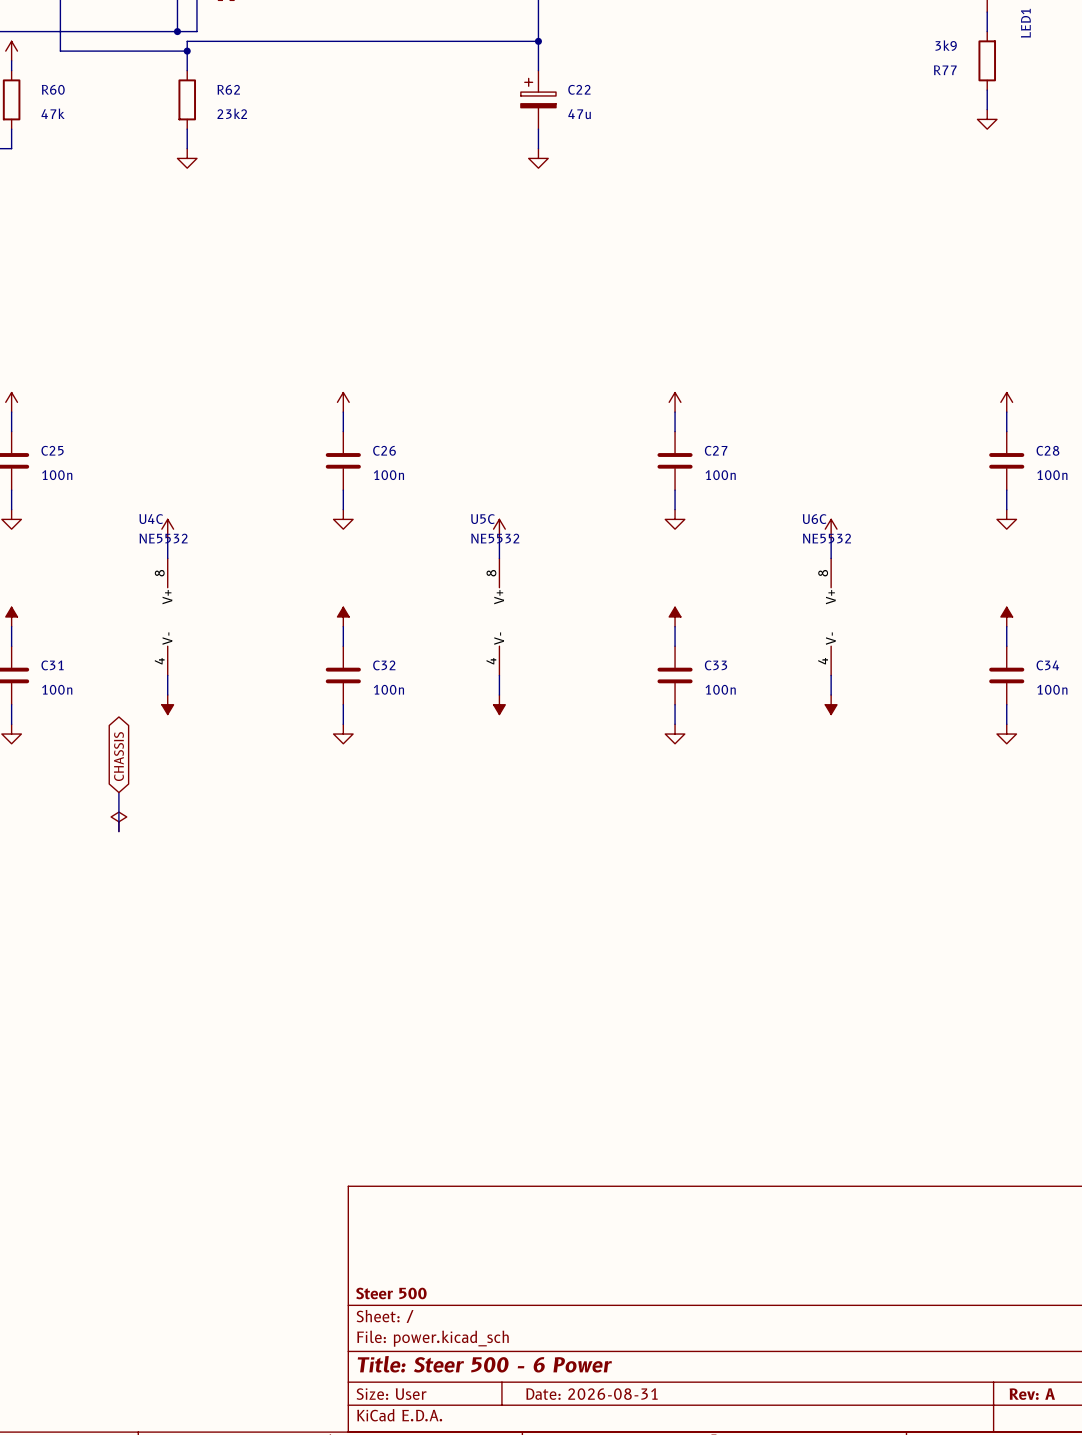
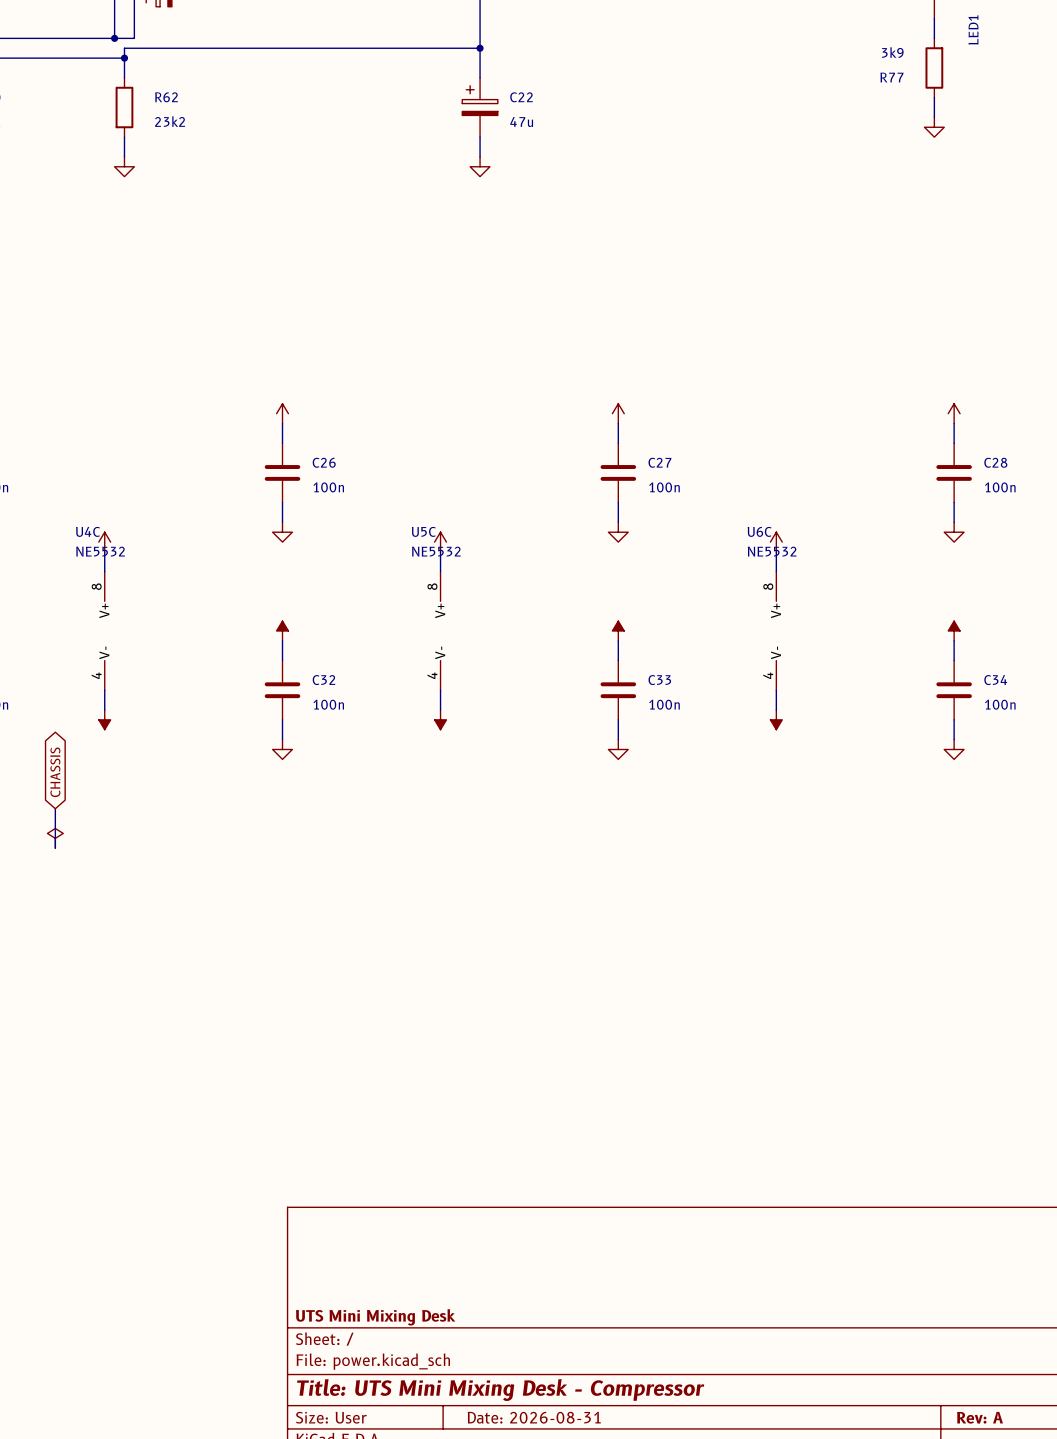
title block: Steer 500 (391, 1293) -> UTS Mini Mixing Desk (375, 1317)
title block: Title: Steer 500 - 6 Power (484, 1364) -> Title: UTS Mini Mixing Desk - Compressor (500, 1390)

